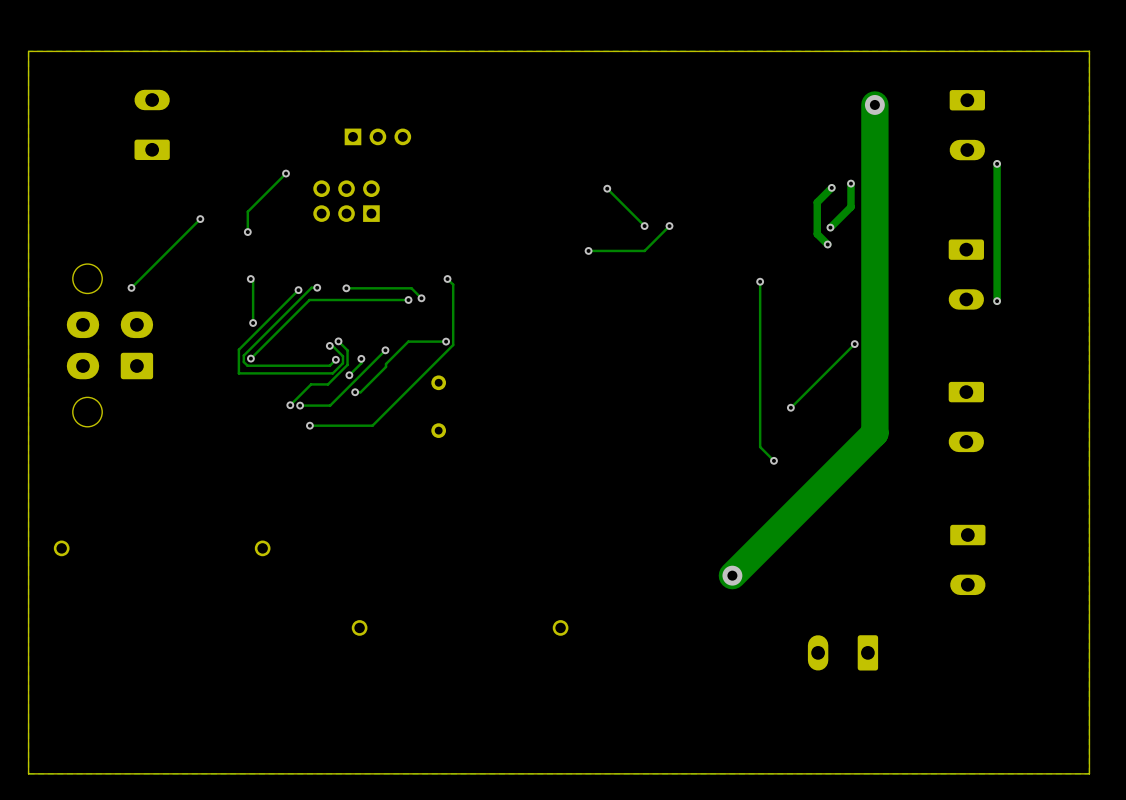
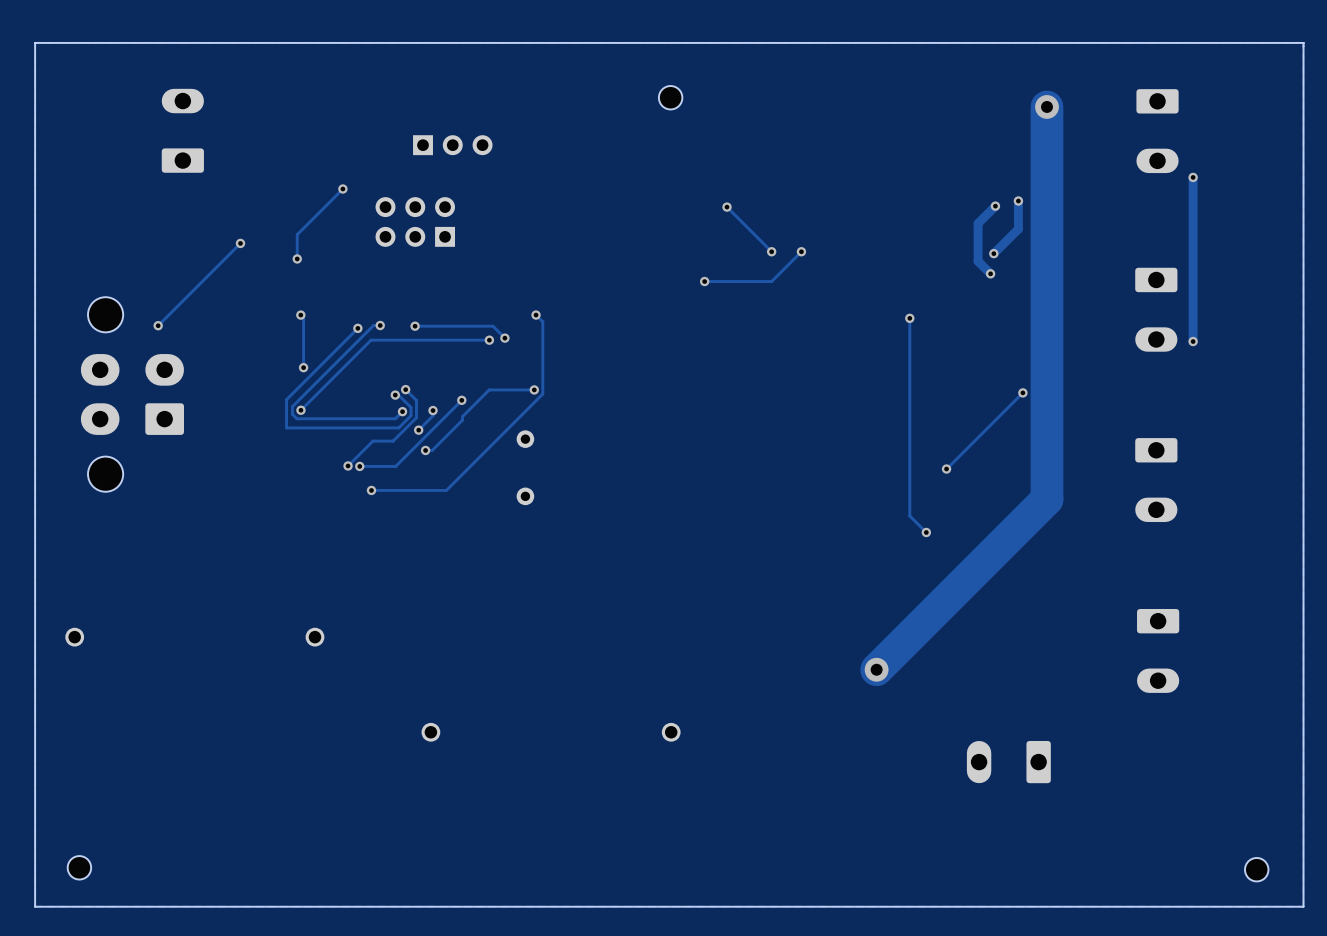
part: none -> (670, 97)
part: none -> (79, 867)
part: none -> (1256, 869)

